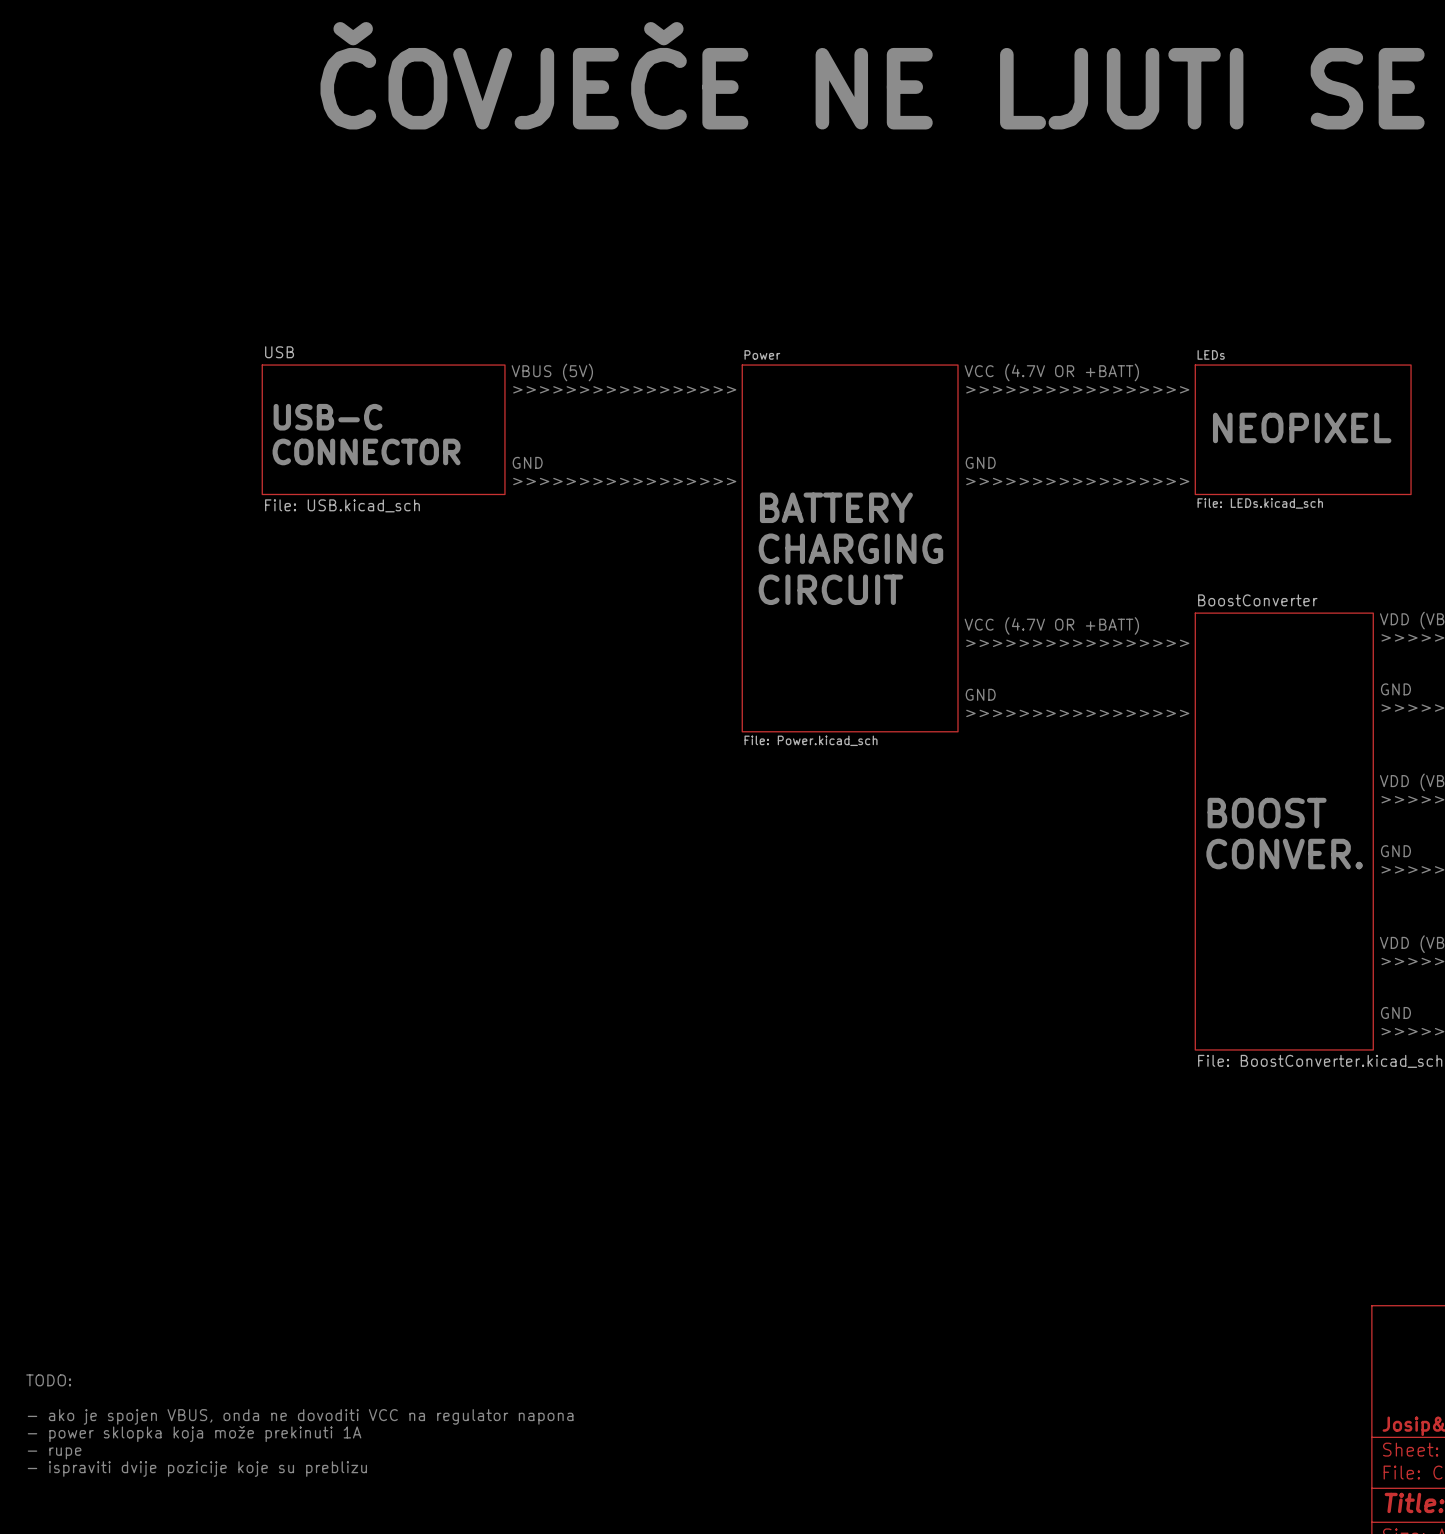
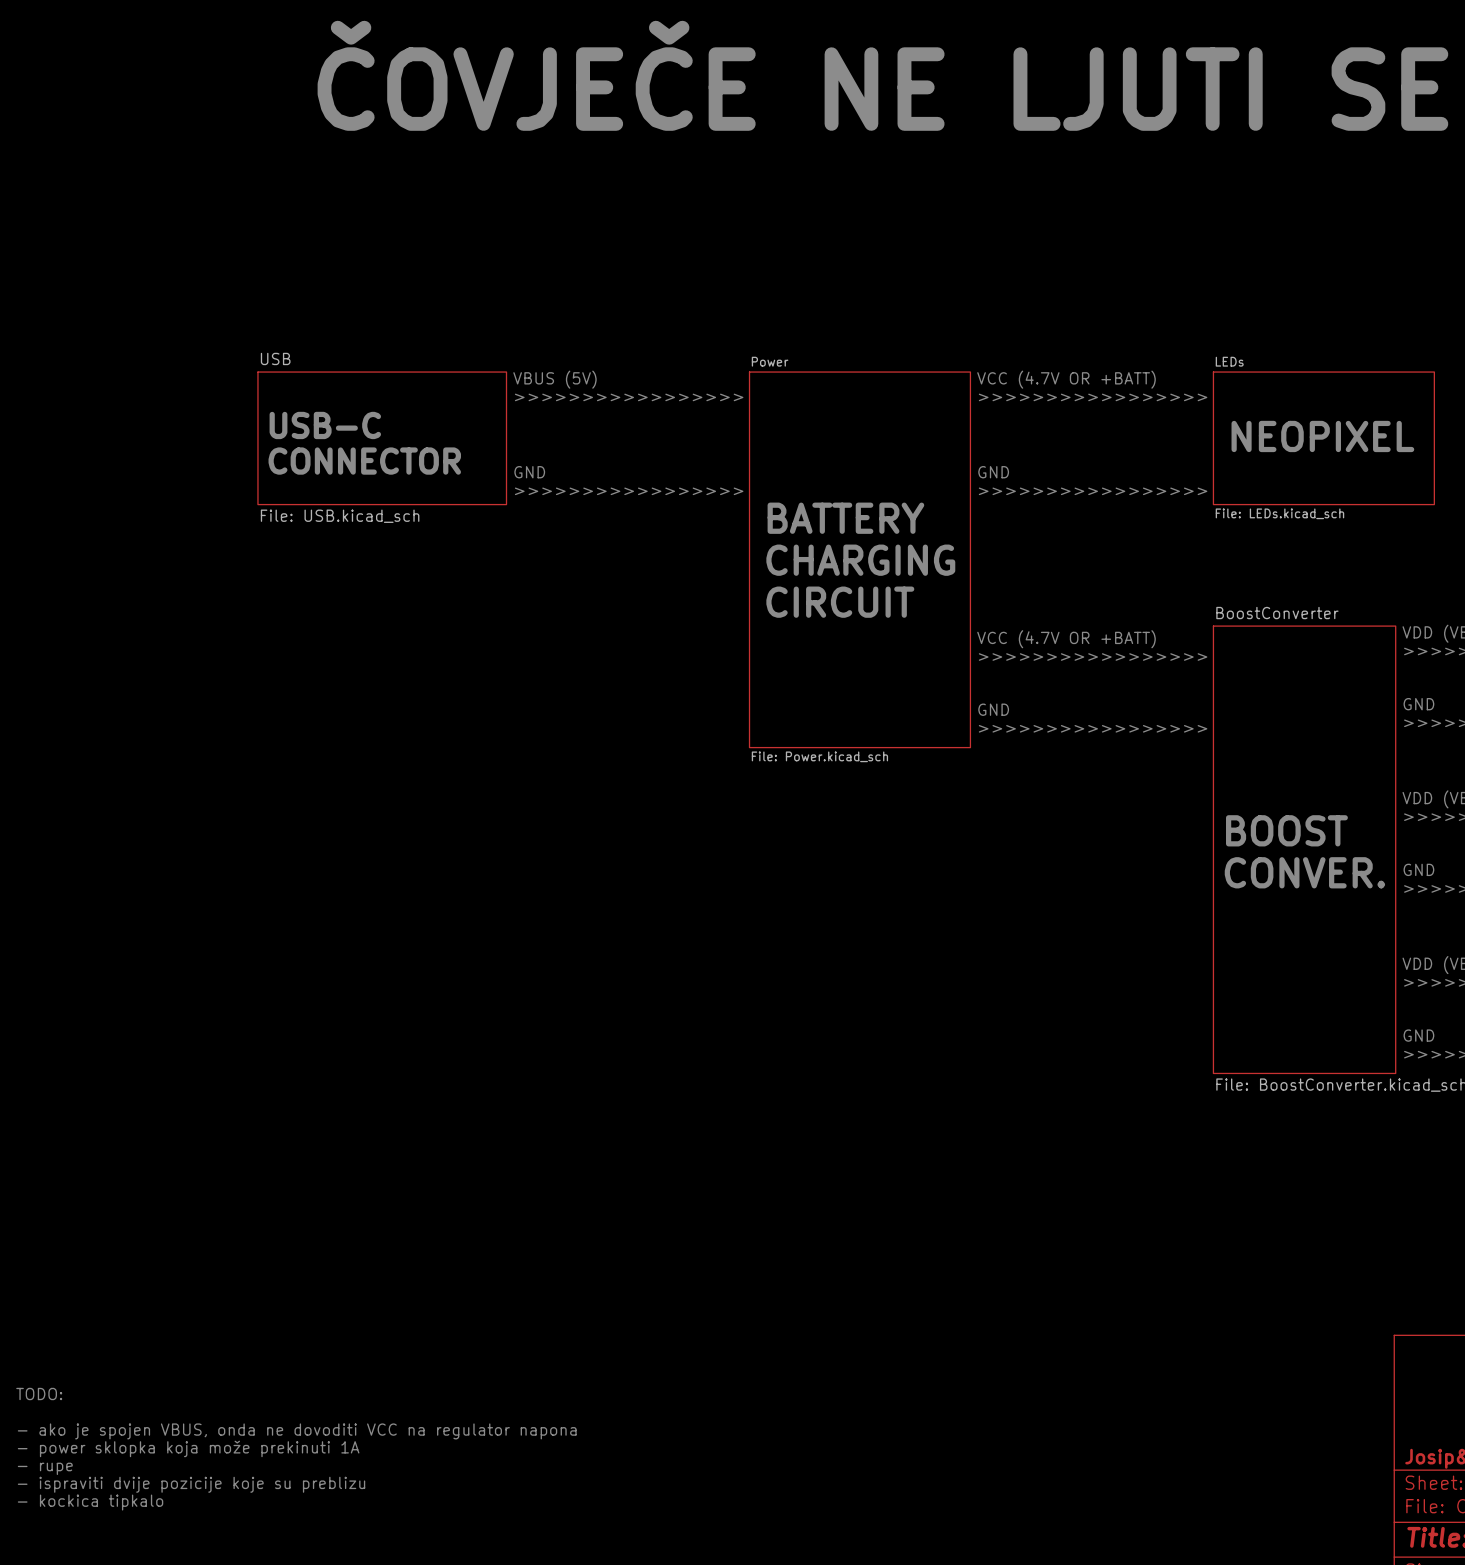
text position: TODO: (48, 1380) -> TODO: (39, 1394)
text: none -> - ako je spojen VBUS, onda ne dovoditi VCC na regulator napona (297, 1431)
text: - ako je spojen VBUS, onda ne dovoditi VCC na regulator napona (300, 1416) -> - power sklopka koja može prekinuti 1A (188, 1448)
text: - power sklopka koja može prekinuti 1A (194, 1434) -> - rupe (45, 1468)
text: - rupe (54, 1453) -> - ispraviti dvije pozicije koje su preblizu (191, 1484)
text: - ispraviti dvije pozicije koje su preblizu (197, 1469) -> - kockica tipkalo (90, 1502)

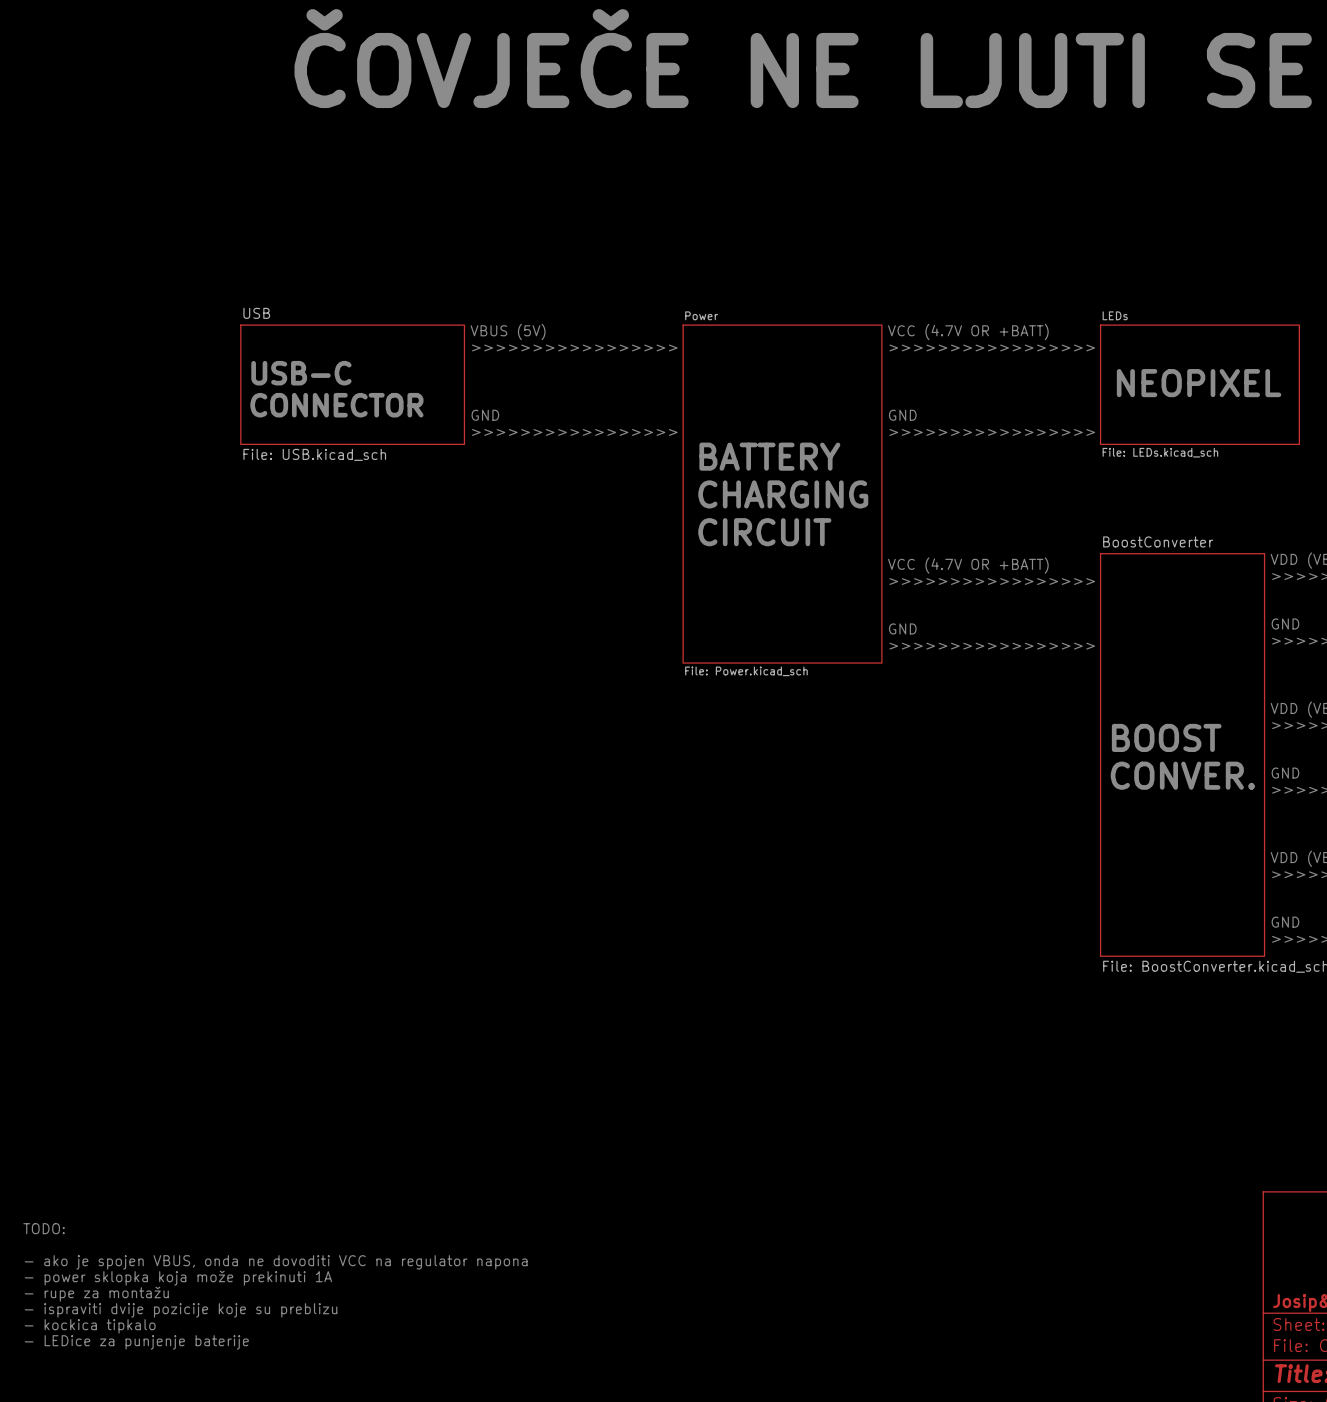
text position: TODO: (39, 1394) -> TODO: (44, 1228)
text: none -> - ako je spojen VBUS, onda ne dovoditi VCC na regulator napona (276, 1262)
text: - ako je spojen VBUS, onda ne dovoditi VCC na regulator napona (297, 1431) -> - power sklopka koja može prekinuti 1A (178, 1278)
text: - power sklopka koja može prekinuti 1A (188, 1448) -> - rupe za montažu (96, 1294)
text: - rupe (45, 1468) -> - ispraviti dvije pozicije koje su preblizu (181, 1310)
text: - ispraviti dvije pozicije koje su preblizu (191, 1484) -> - kockica tipkalo (90, 1326)
text: - kockica tipkalo (90, 1502) -> - LEDice za punjenje baterije (136, 1342)

